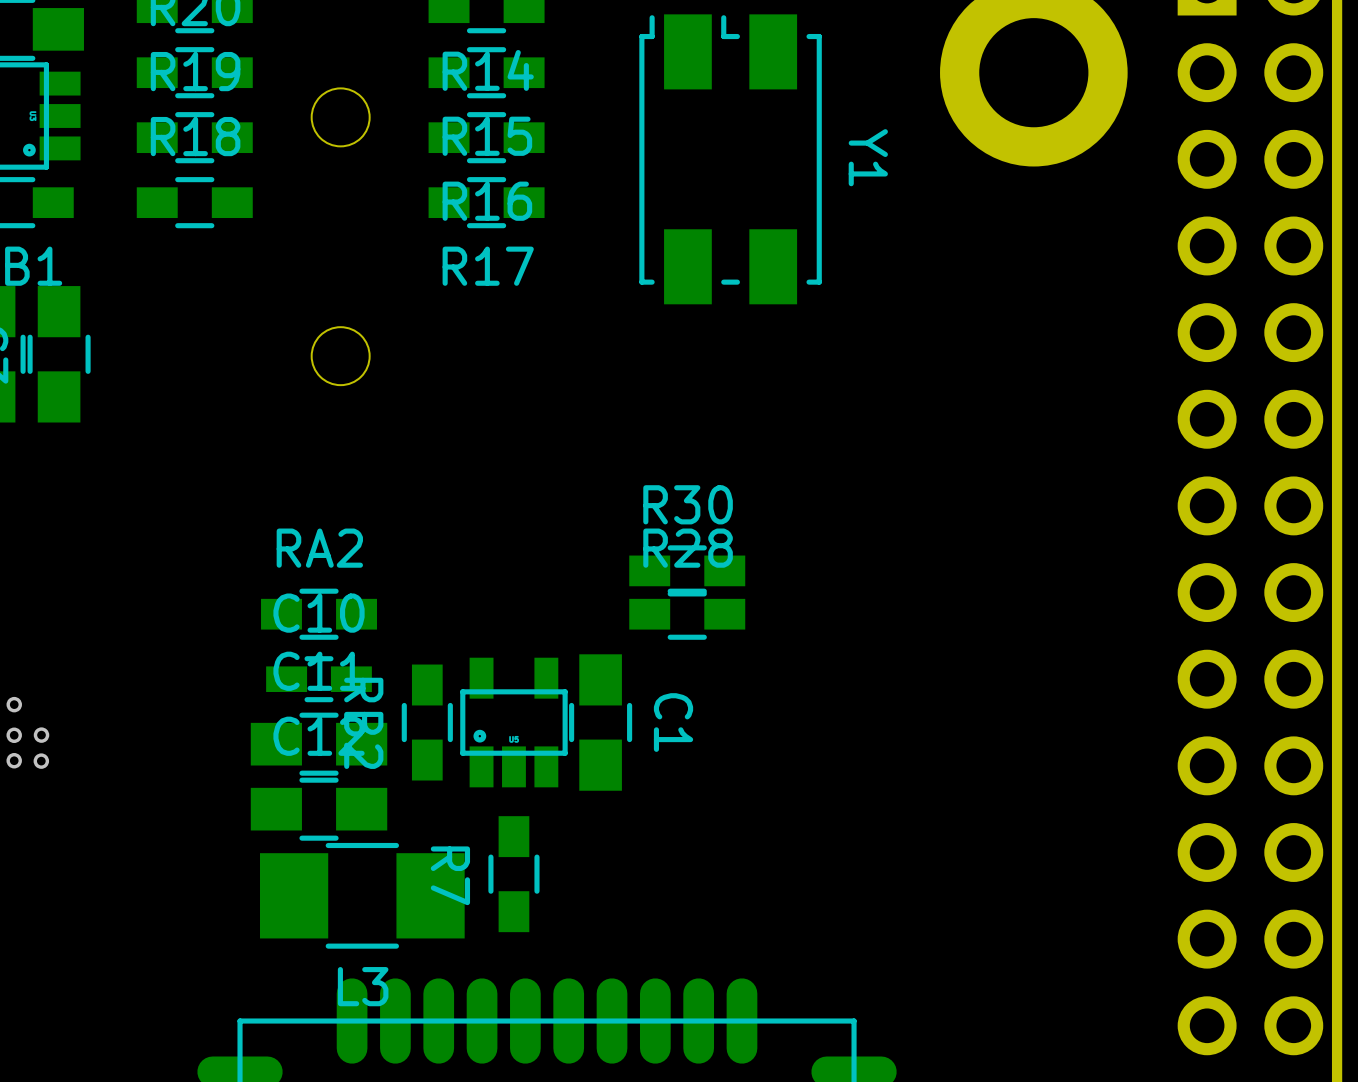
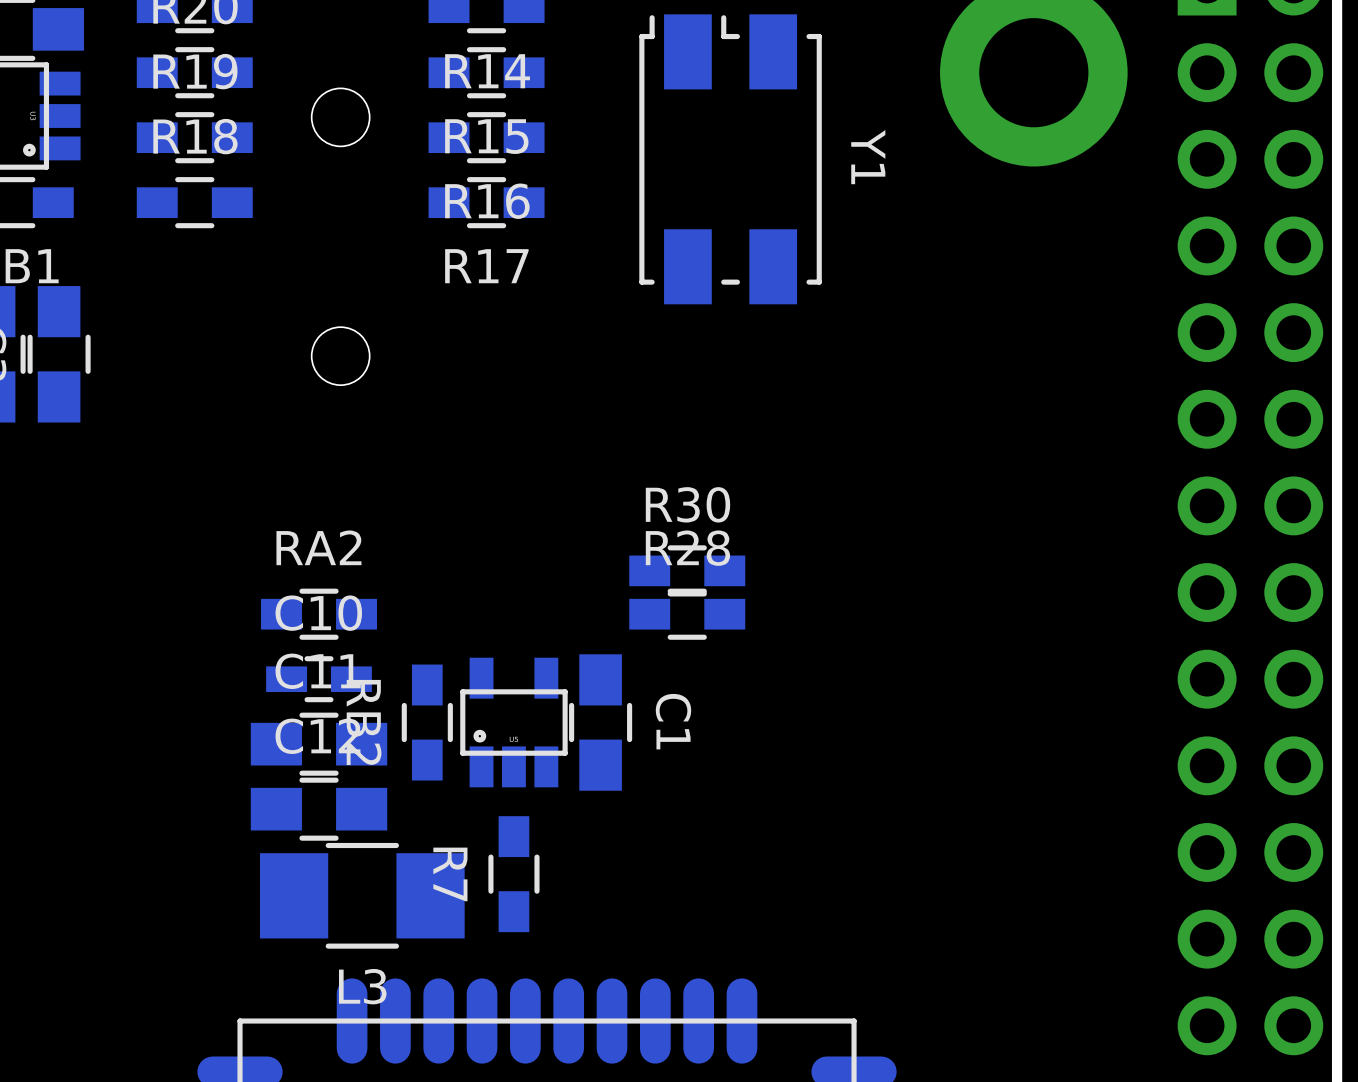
via: (14, 704) -> none
via: (14, 735) -> none
via: (41, 735) -> none
via: (14, 760) -> none
via: (41, 761) -> none

